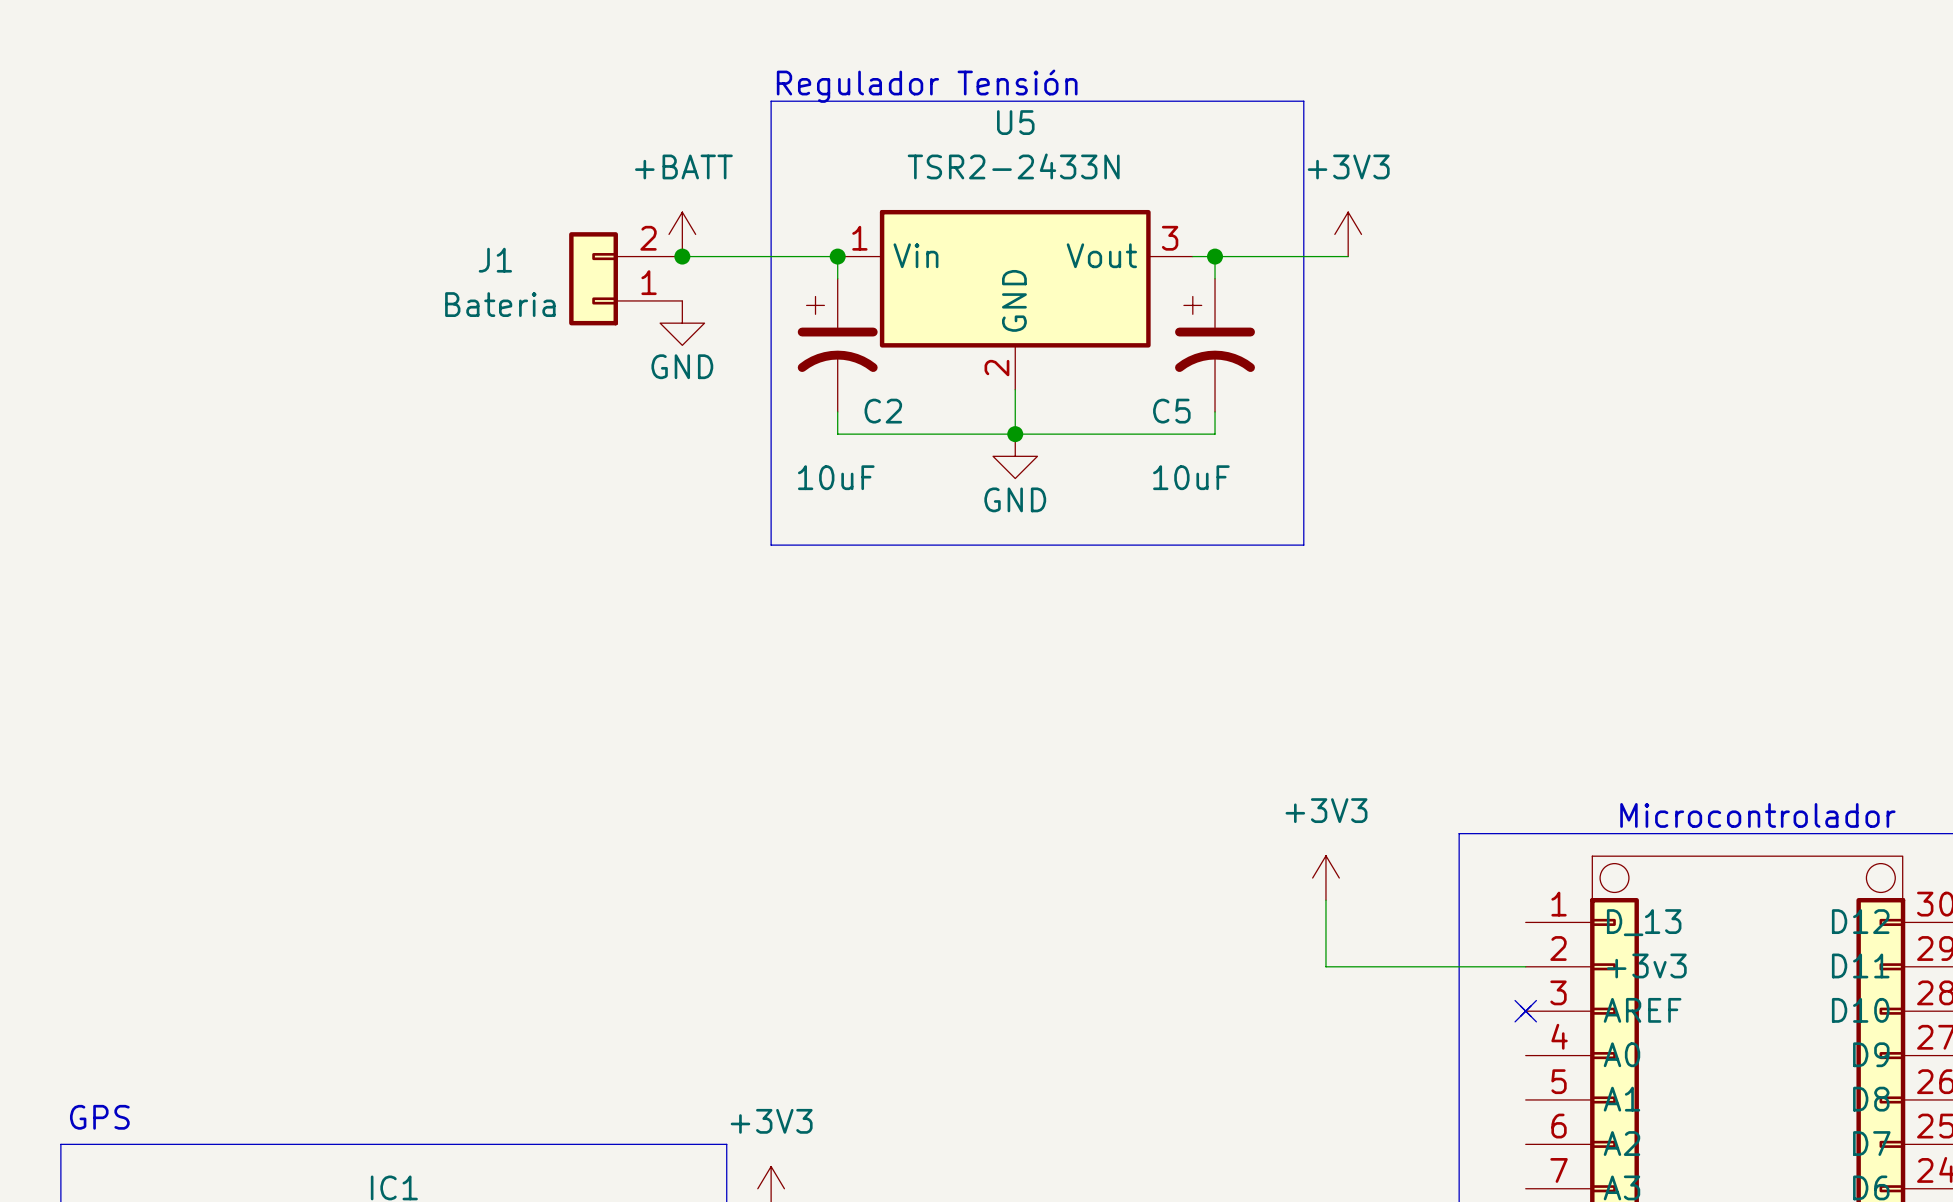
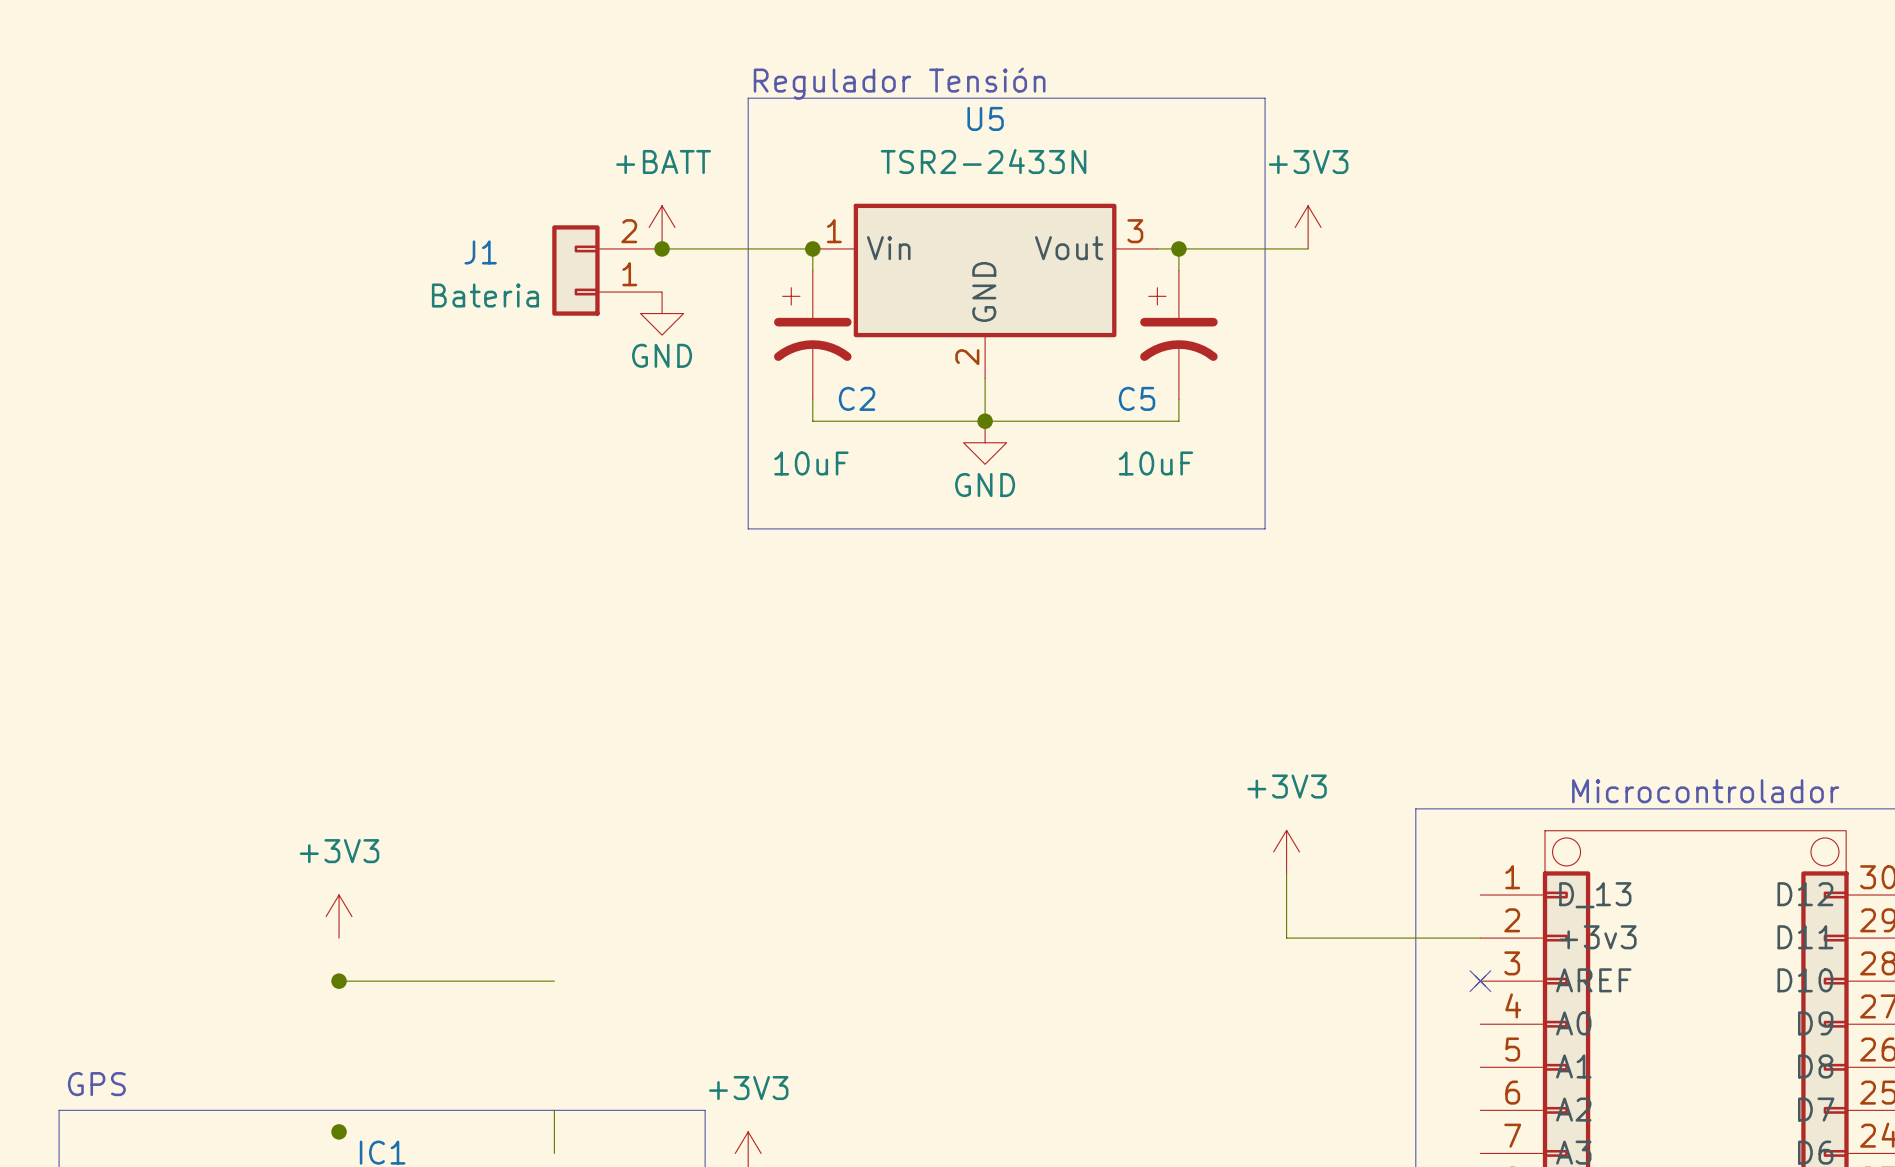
power symbol: none -> +3V3 (339, 916)
wire: none -> (339, 981) (554, 981)
junction: none -> (339, 981)
wire: none -> (554, 1110) (554, 1153)
junction: none -> (339, 1131)

